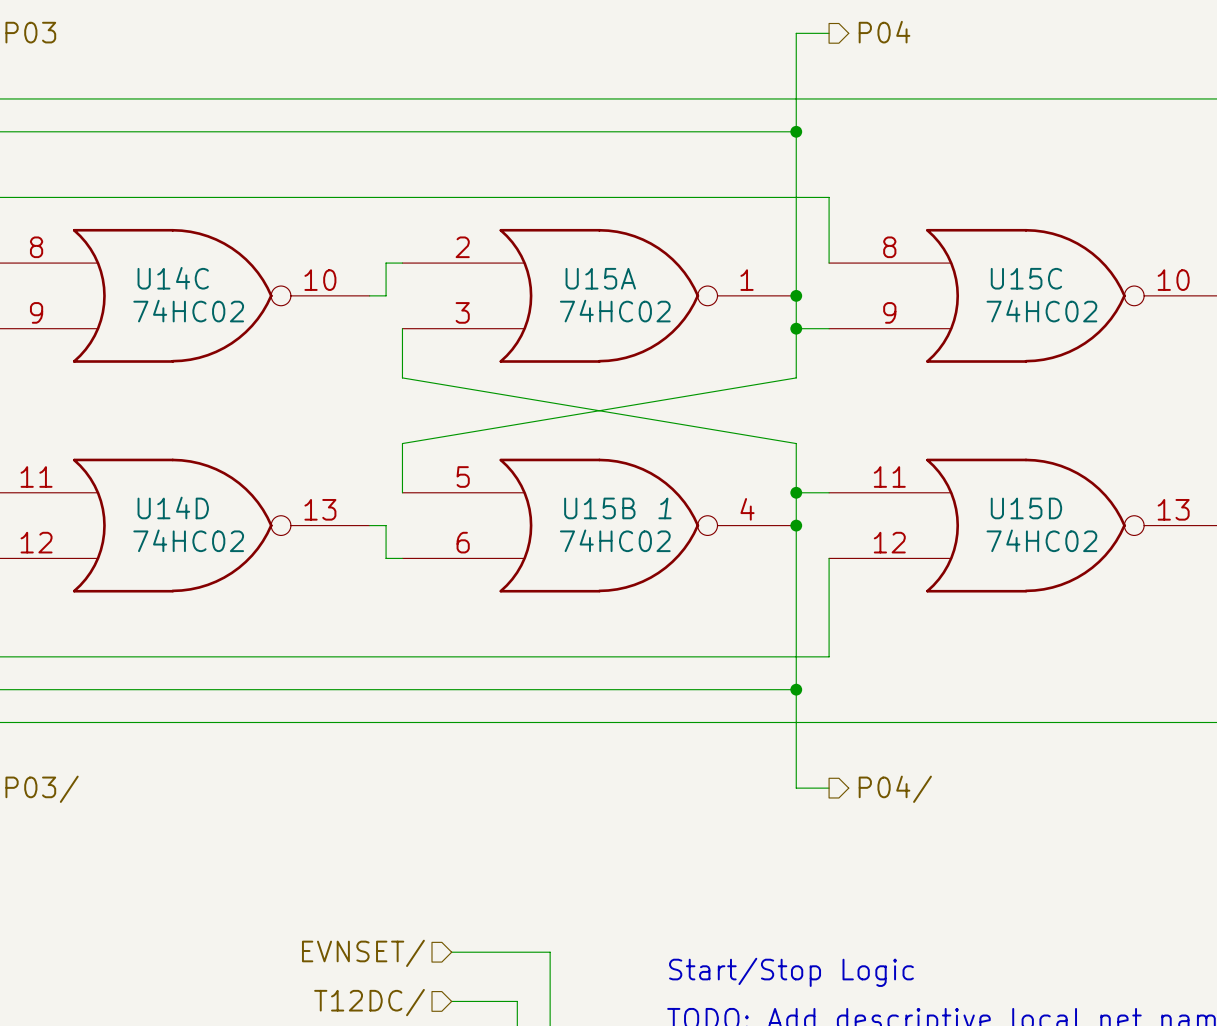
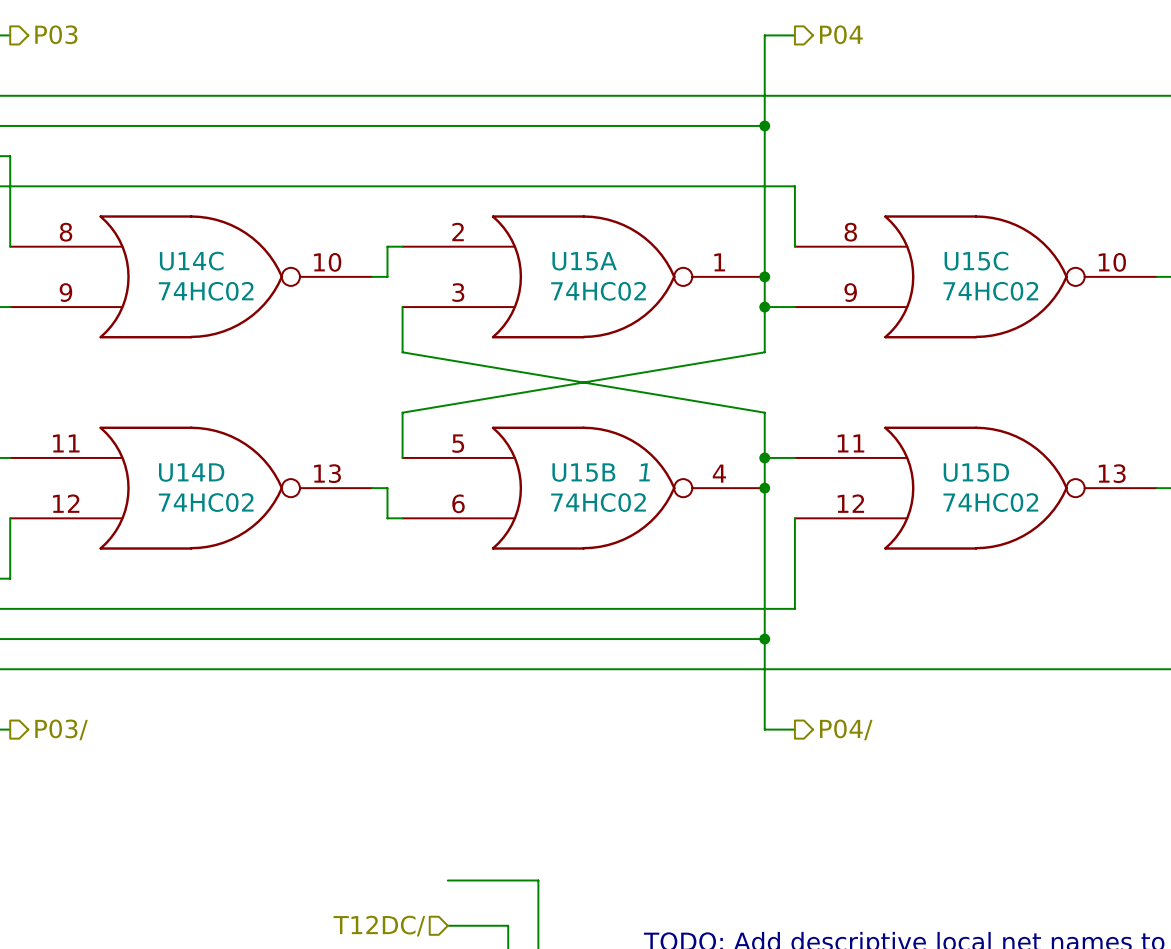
hierarchical label: EVNSET/ (363, 953) -> none
text: Start/Stop Logic (791, 972) -> none

